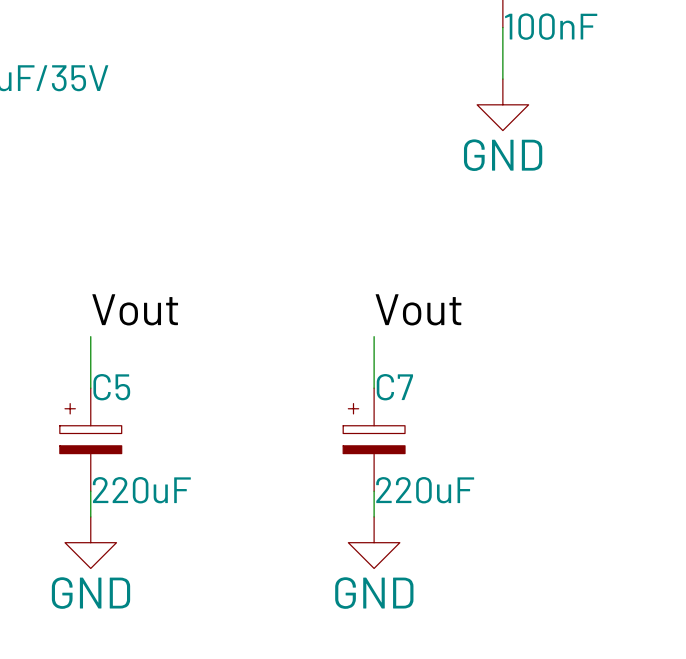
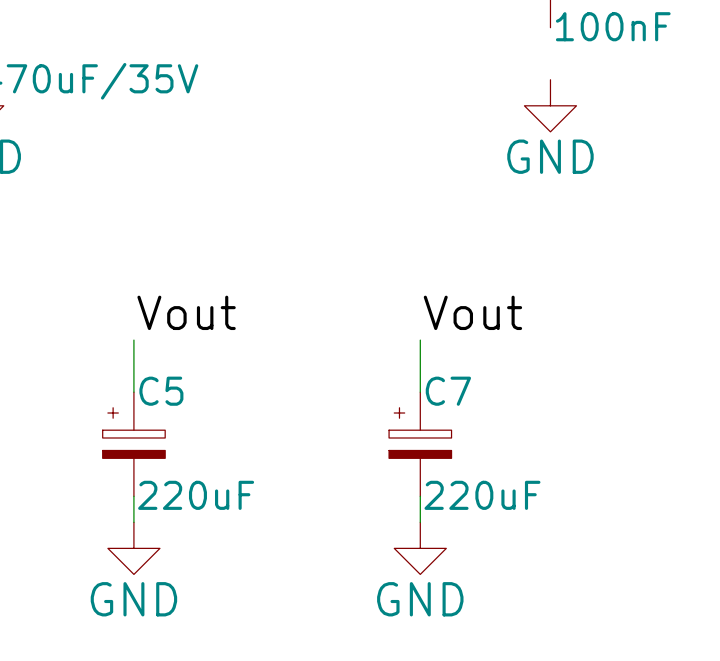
wire: (502, 27) (502, 79) -> none

